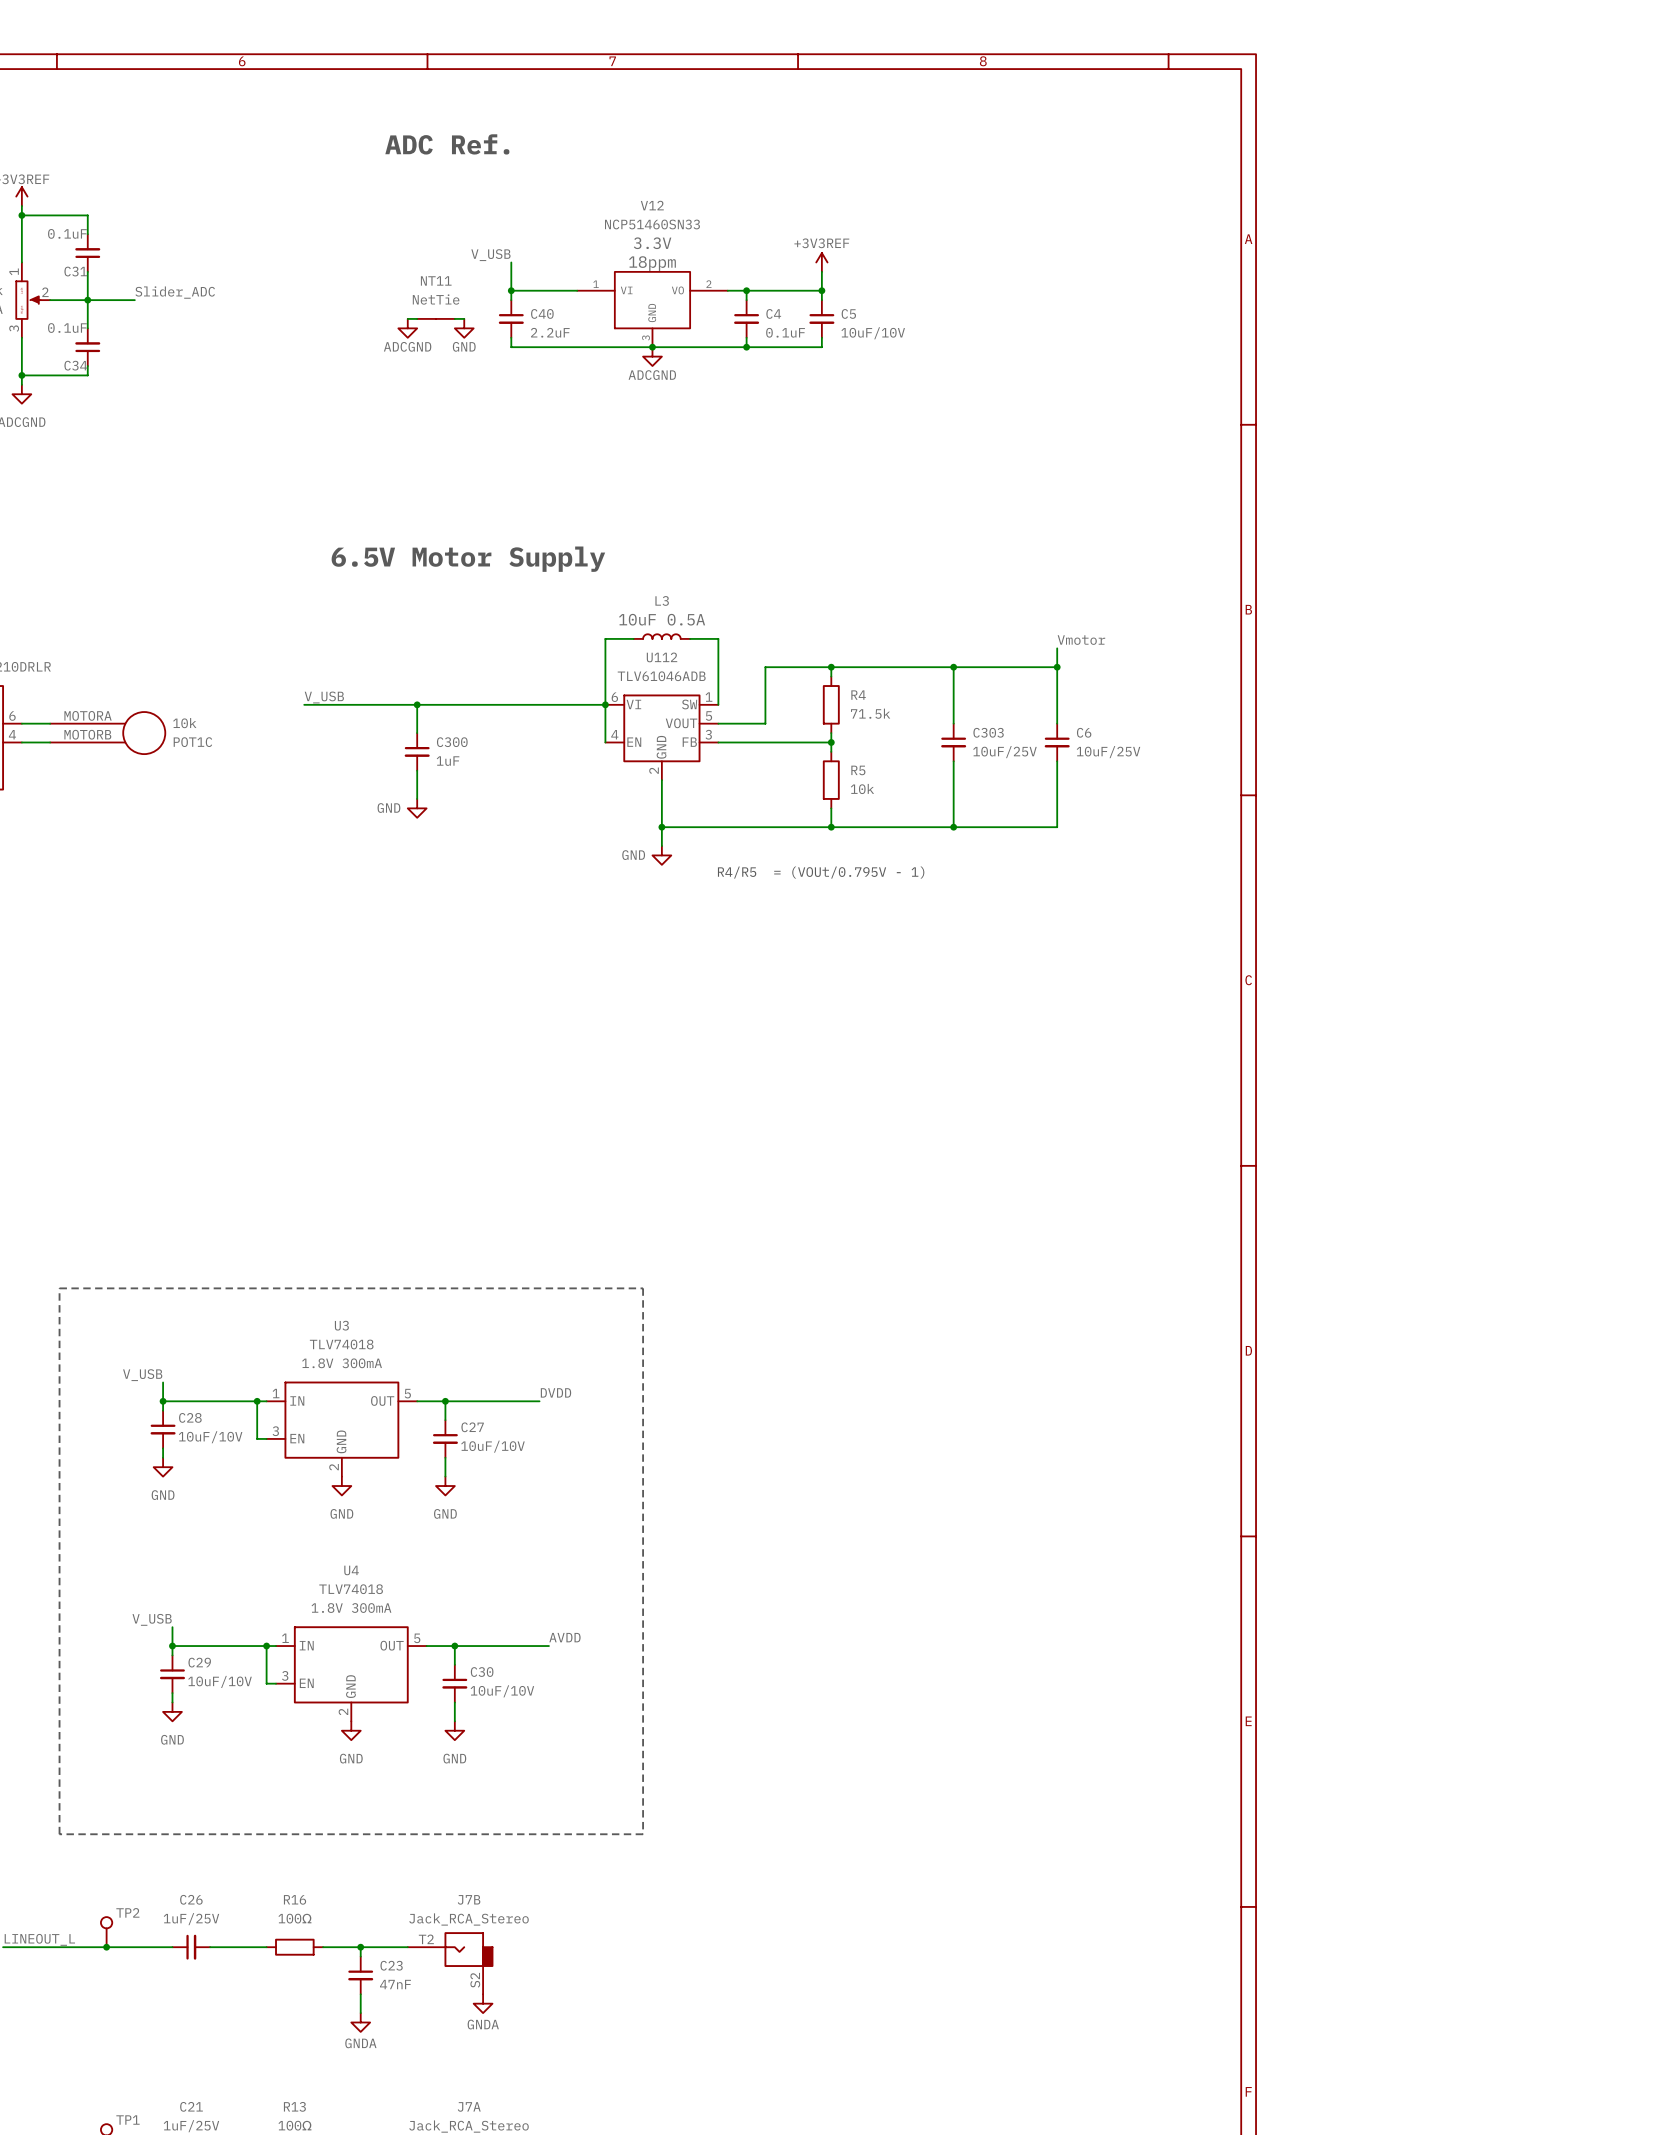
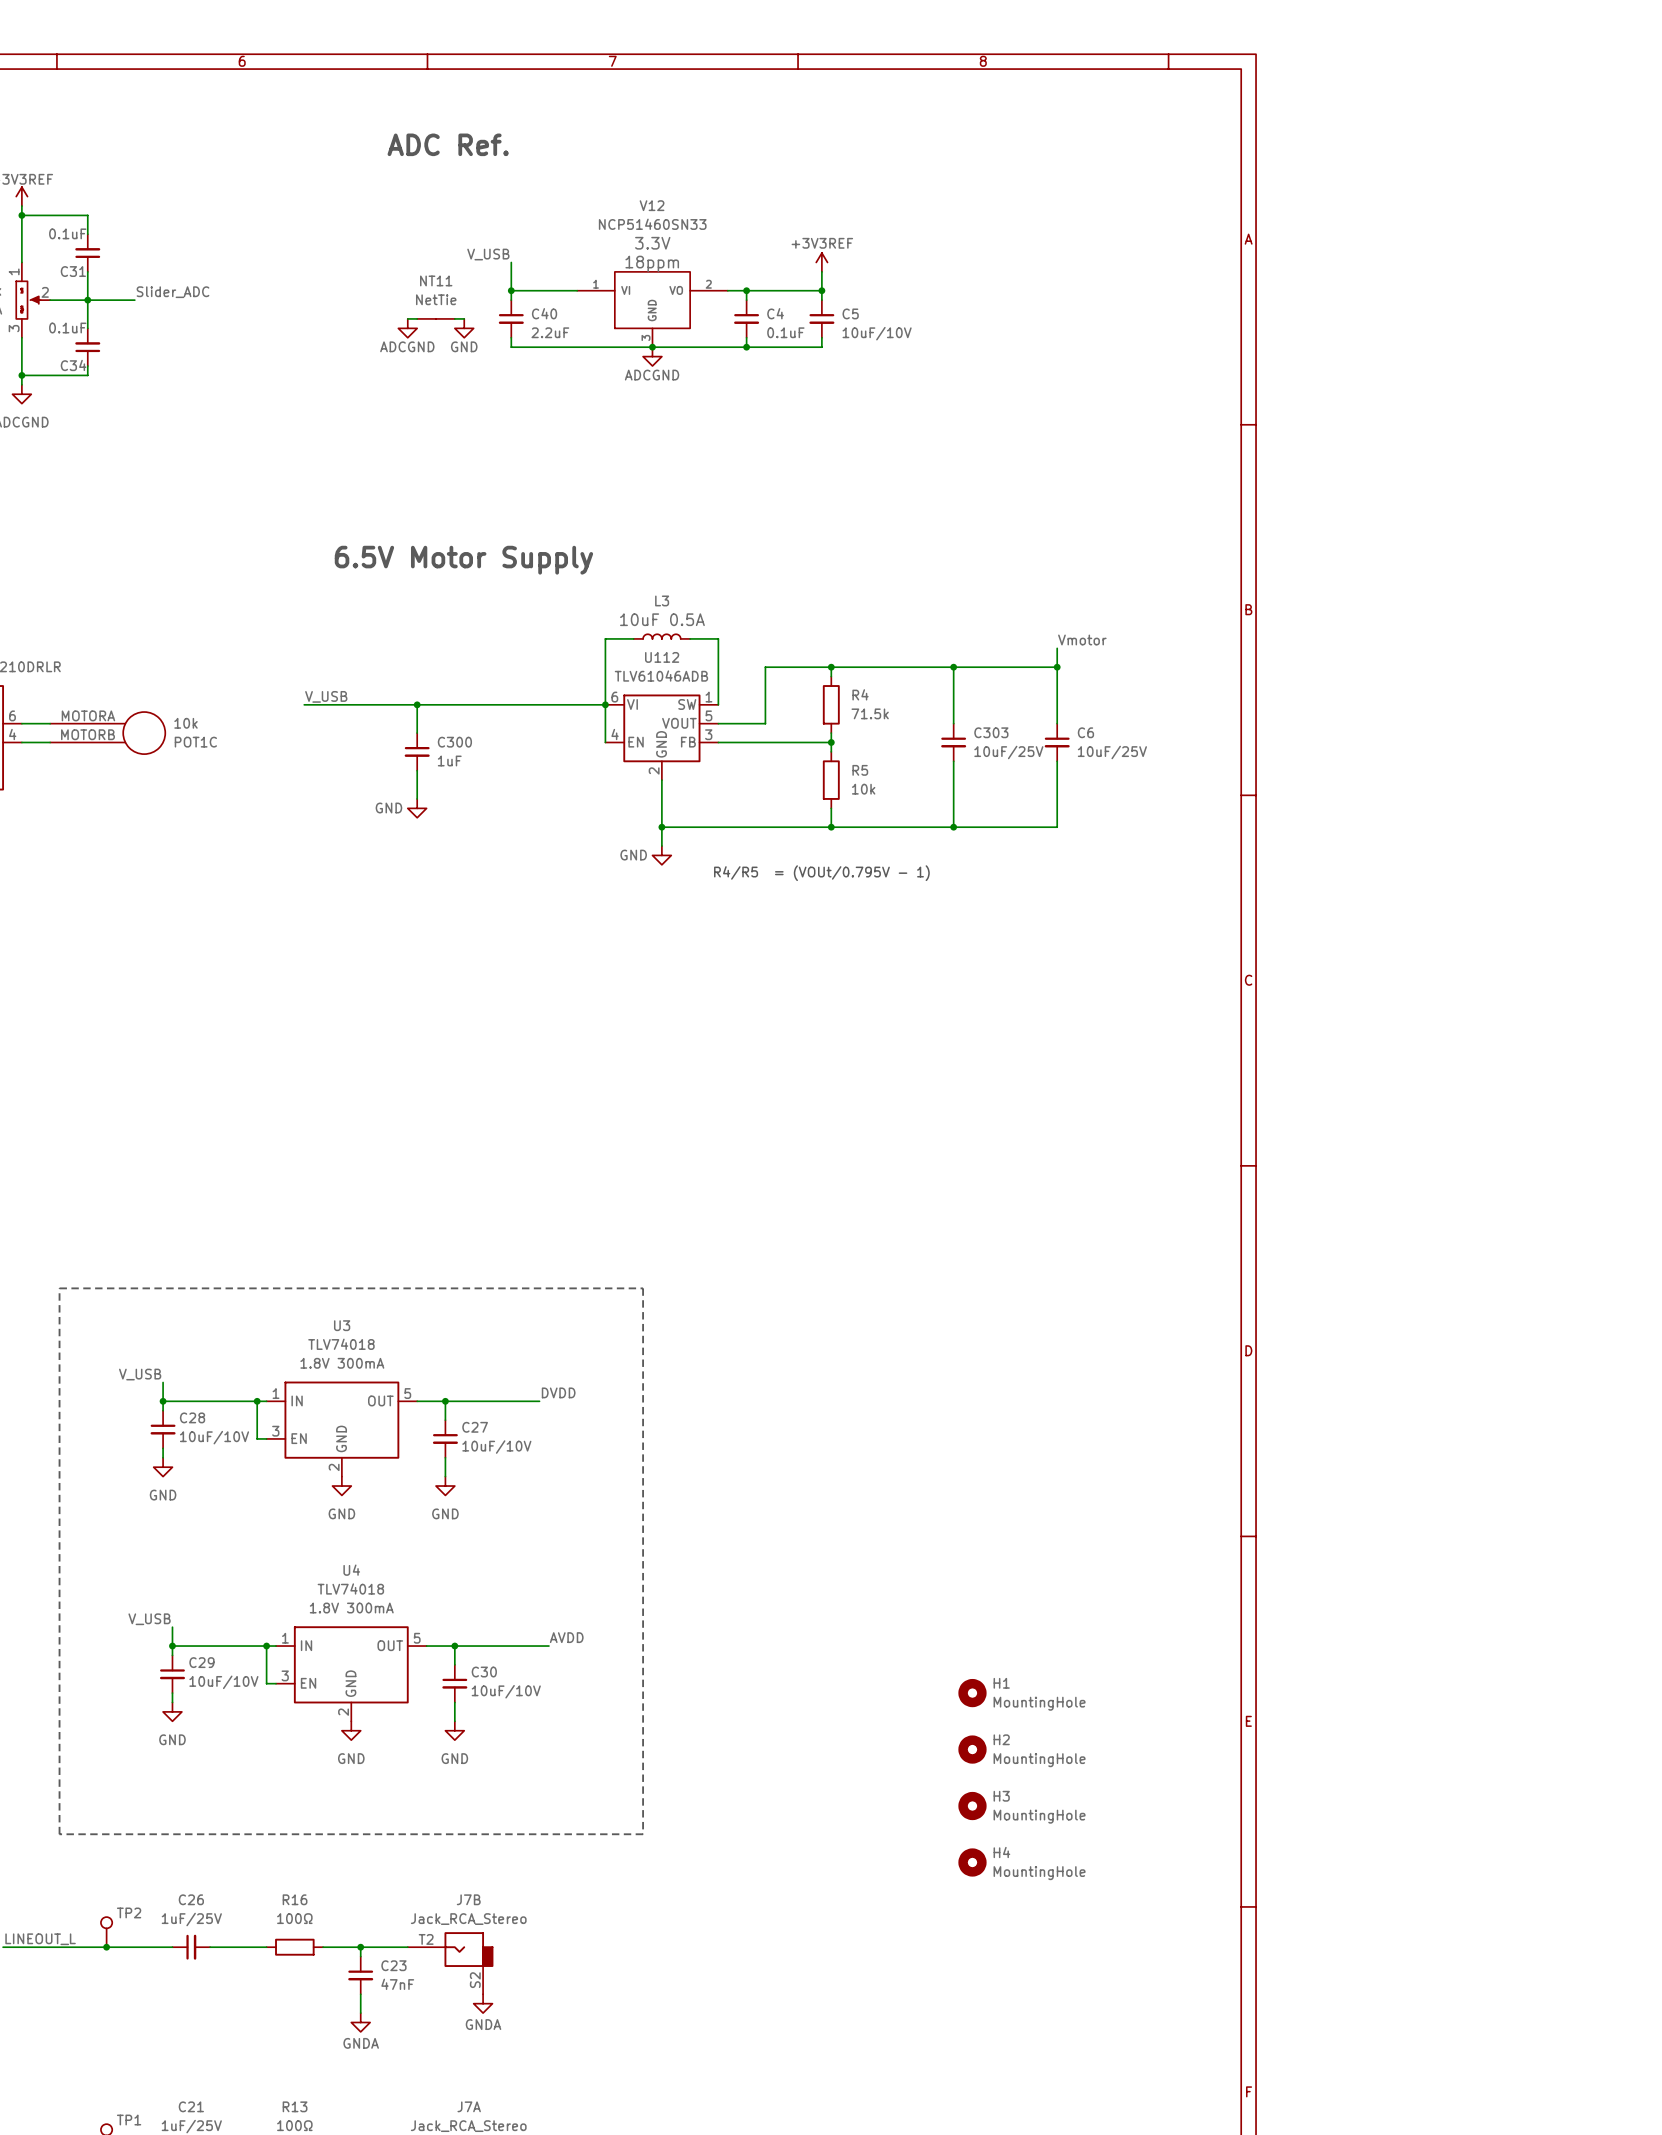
H1: none -> MountingHole (972, 1693)
H2: none -> MountingHole (972, 1749)
H3: none -> MountingHole (972, 1806)
H4: none -> MountingHole (972, 1862)

